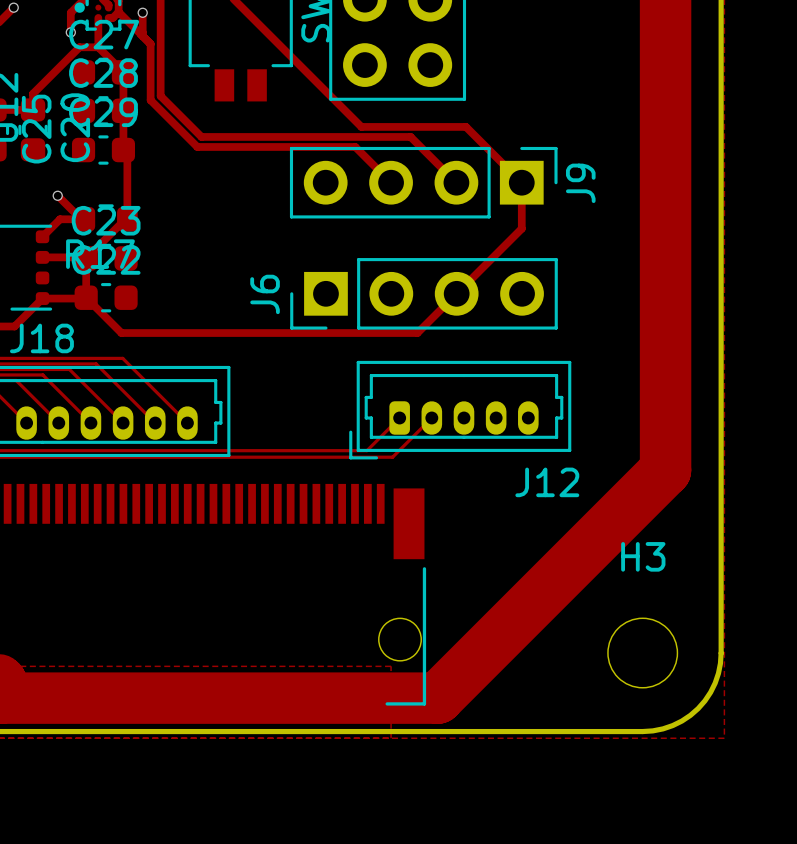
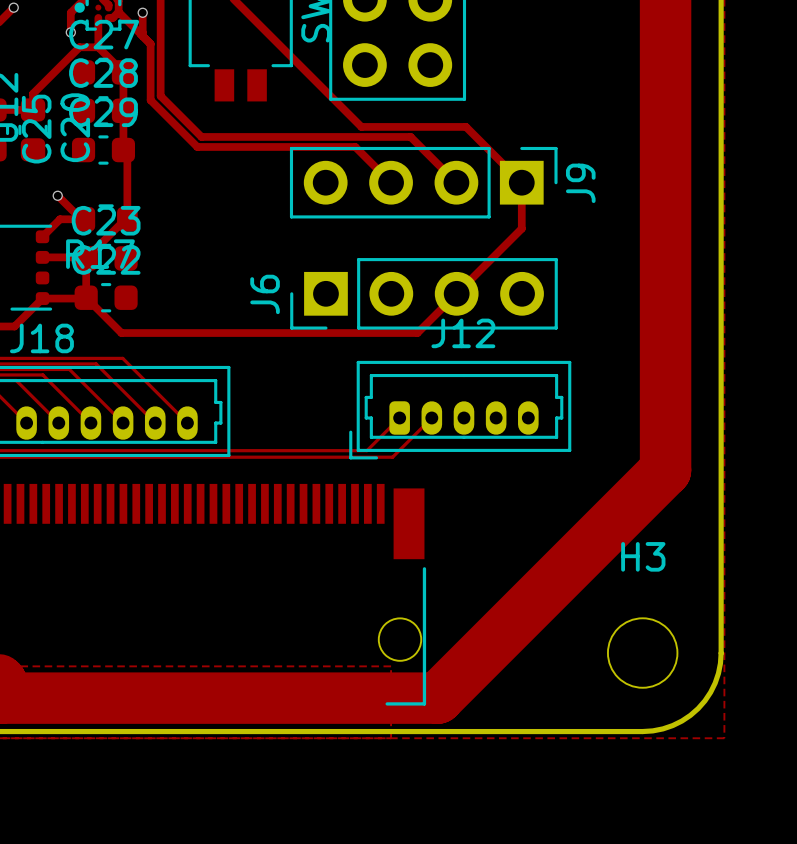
J12 name position: J12 (547, 482) -> J12 (463, 333)

